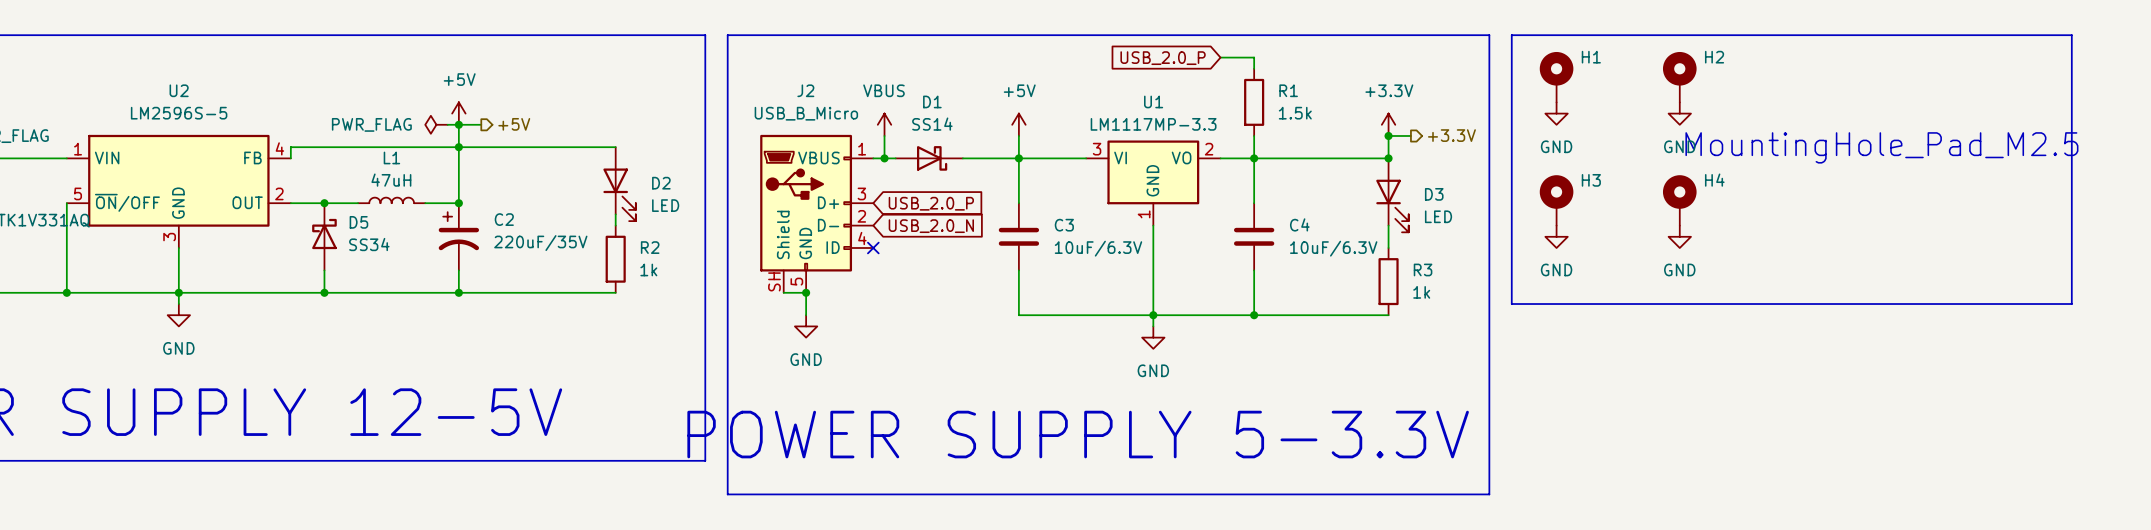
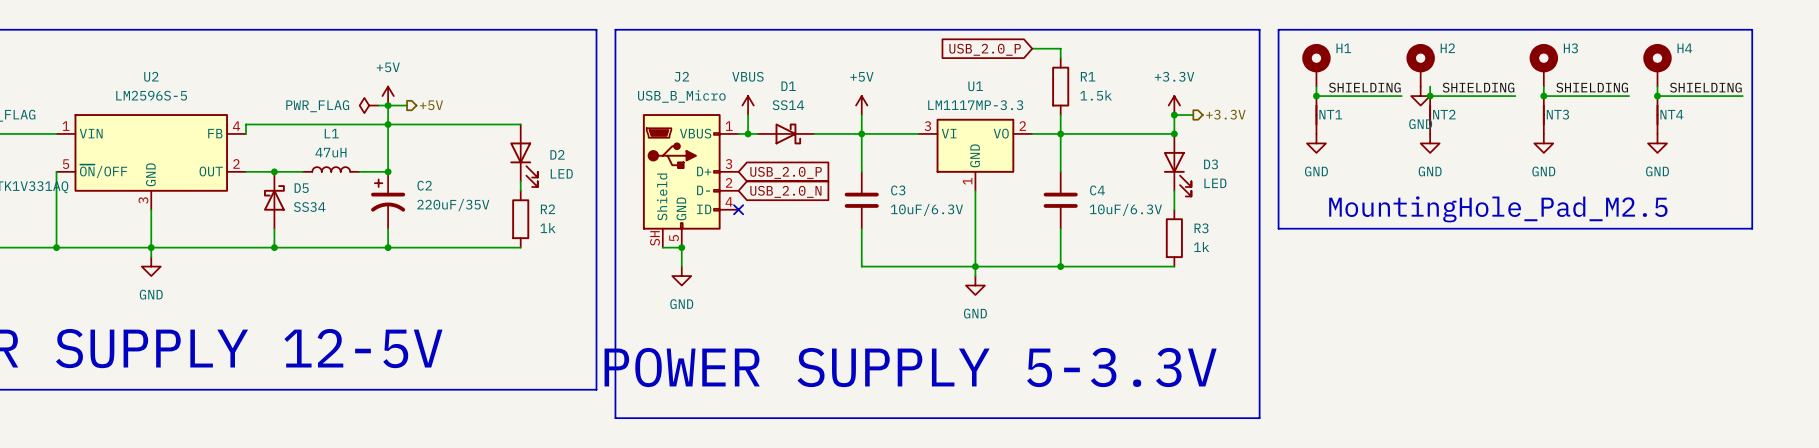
wire: none -> (1316, 86) (1316, 96) (1401, 96)
wire: none -> (1430, 86) (1430, 96) (1515, 96)
wire: none -> (1543, 86) (1543, 96) (1629, 96)
wire: none -> (1657, 86) (1657, 96) (1742, 96)
label: none -> SHIELDING (1364, 87)
label: none -> SHIELDING (1478, 87)
label: none -> SHIELDING (1592, 87)
label: none -> SHIELDING (1705, 87)
power symbol: GND (1556, 113) -> none
junction: none -> (1316, 96)
junction: none -> (1430, 96)
junction: none -> (1543, 96)
junction: none -> (1657, 96)
NT1: none -> (1316, 115)
NT2: none -> (1430, 115)
NT3: none -> (1543, 115)
NT4: none -> (1657, 115)
text position: MountingHole_Pad_M2.5 (1881, 147) -> MountingHole_Pad_M2.5 (1498, 209)
power symbol: none -> GND (1316, 143)
power symbol: none -> GND (1543, 143)
power symbol: none -> GND (1657, 143)
H3 position: (1556, 200) -> (1543, 65)
H4 position: (1679, 200) -> (1657, 65)
power symbol: GND (1556, 236) -> none
power symbol position: GND (1679, 236) -> GND (1430, 143)
line: (1511, 270) (1511, 304) (2071, 304) (2071, 270) -> (1278, 228) (1752, 228)

